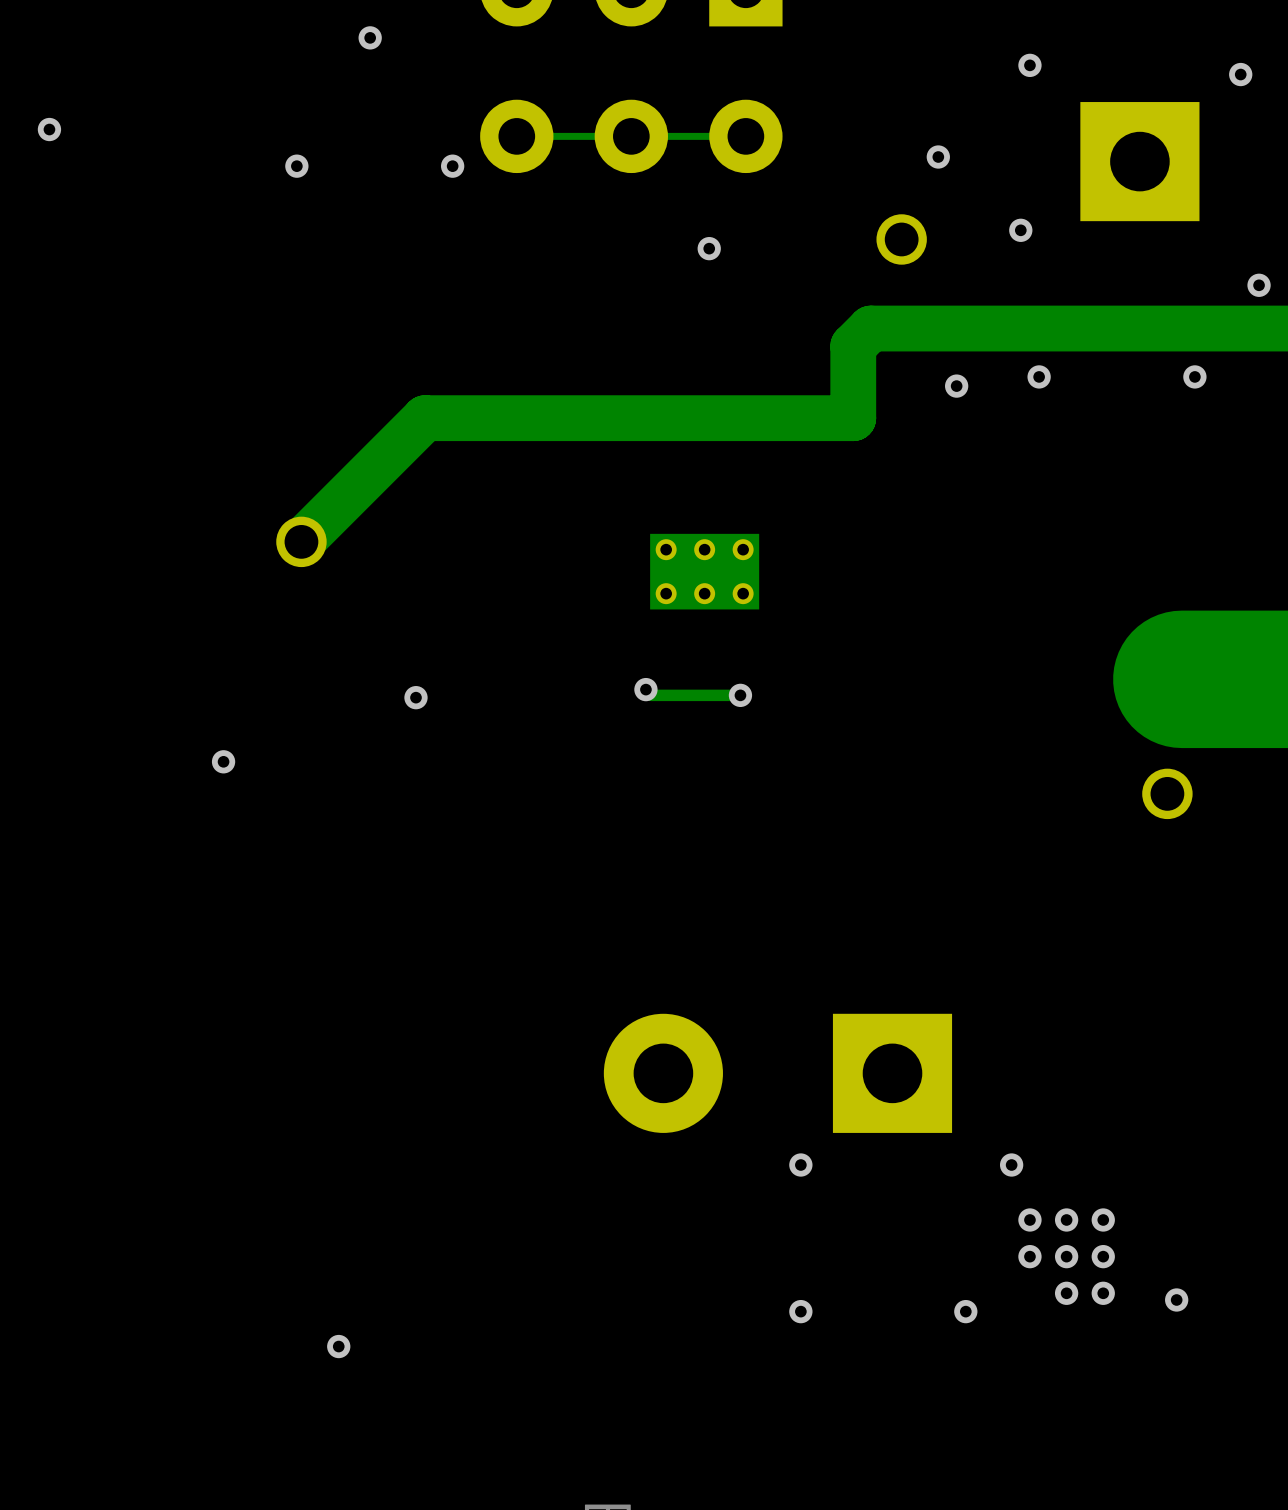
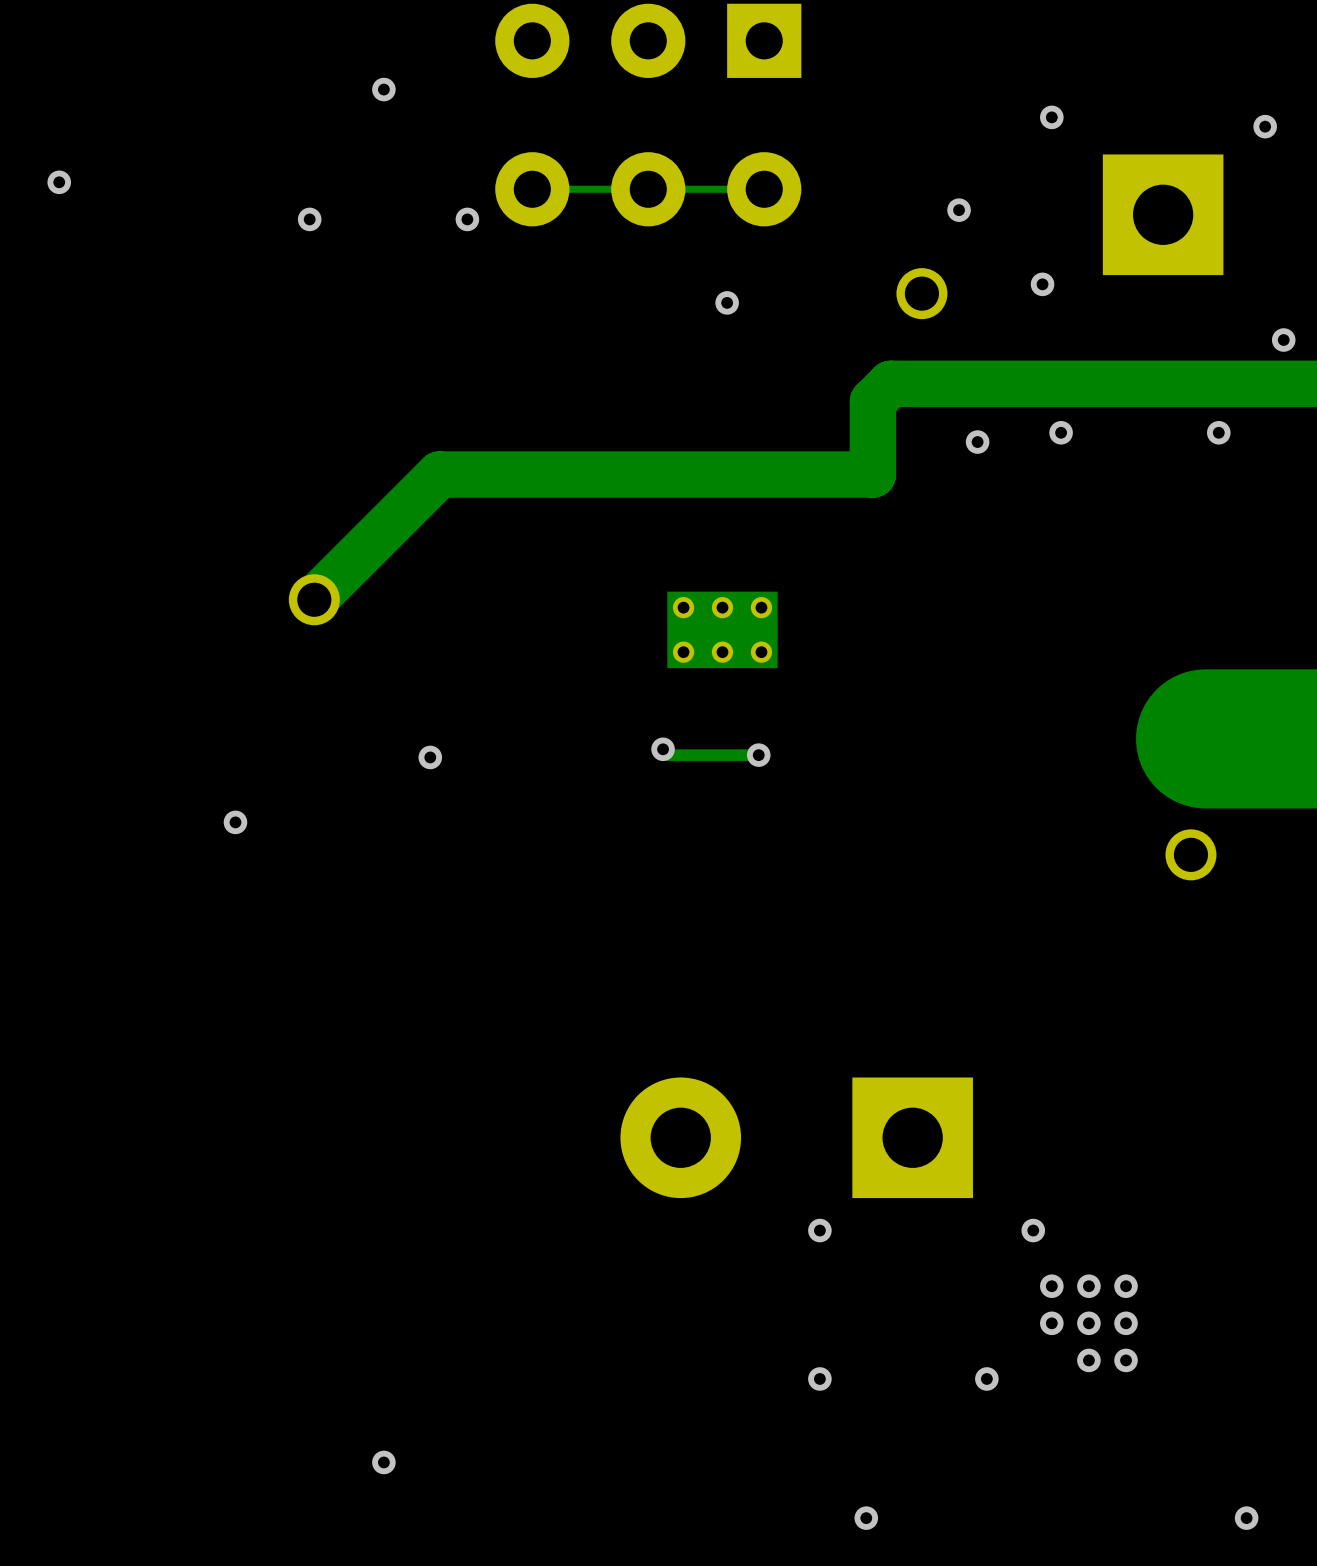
via: (1176, 1299) -> none
via position: (338, 1346) -> (383, 1462)
via: none -> (866, 1518)
via: none -> (1246, 1518)

